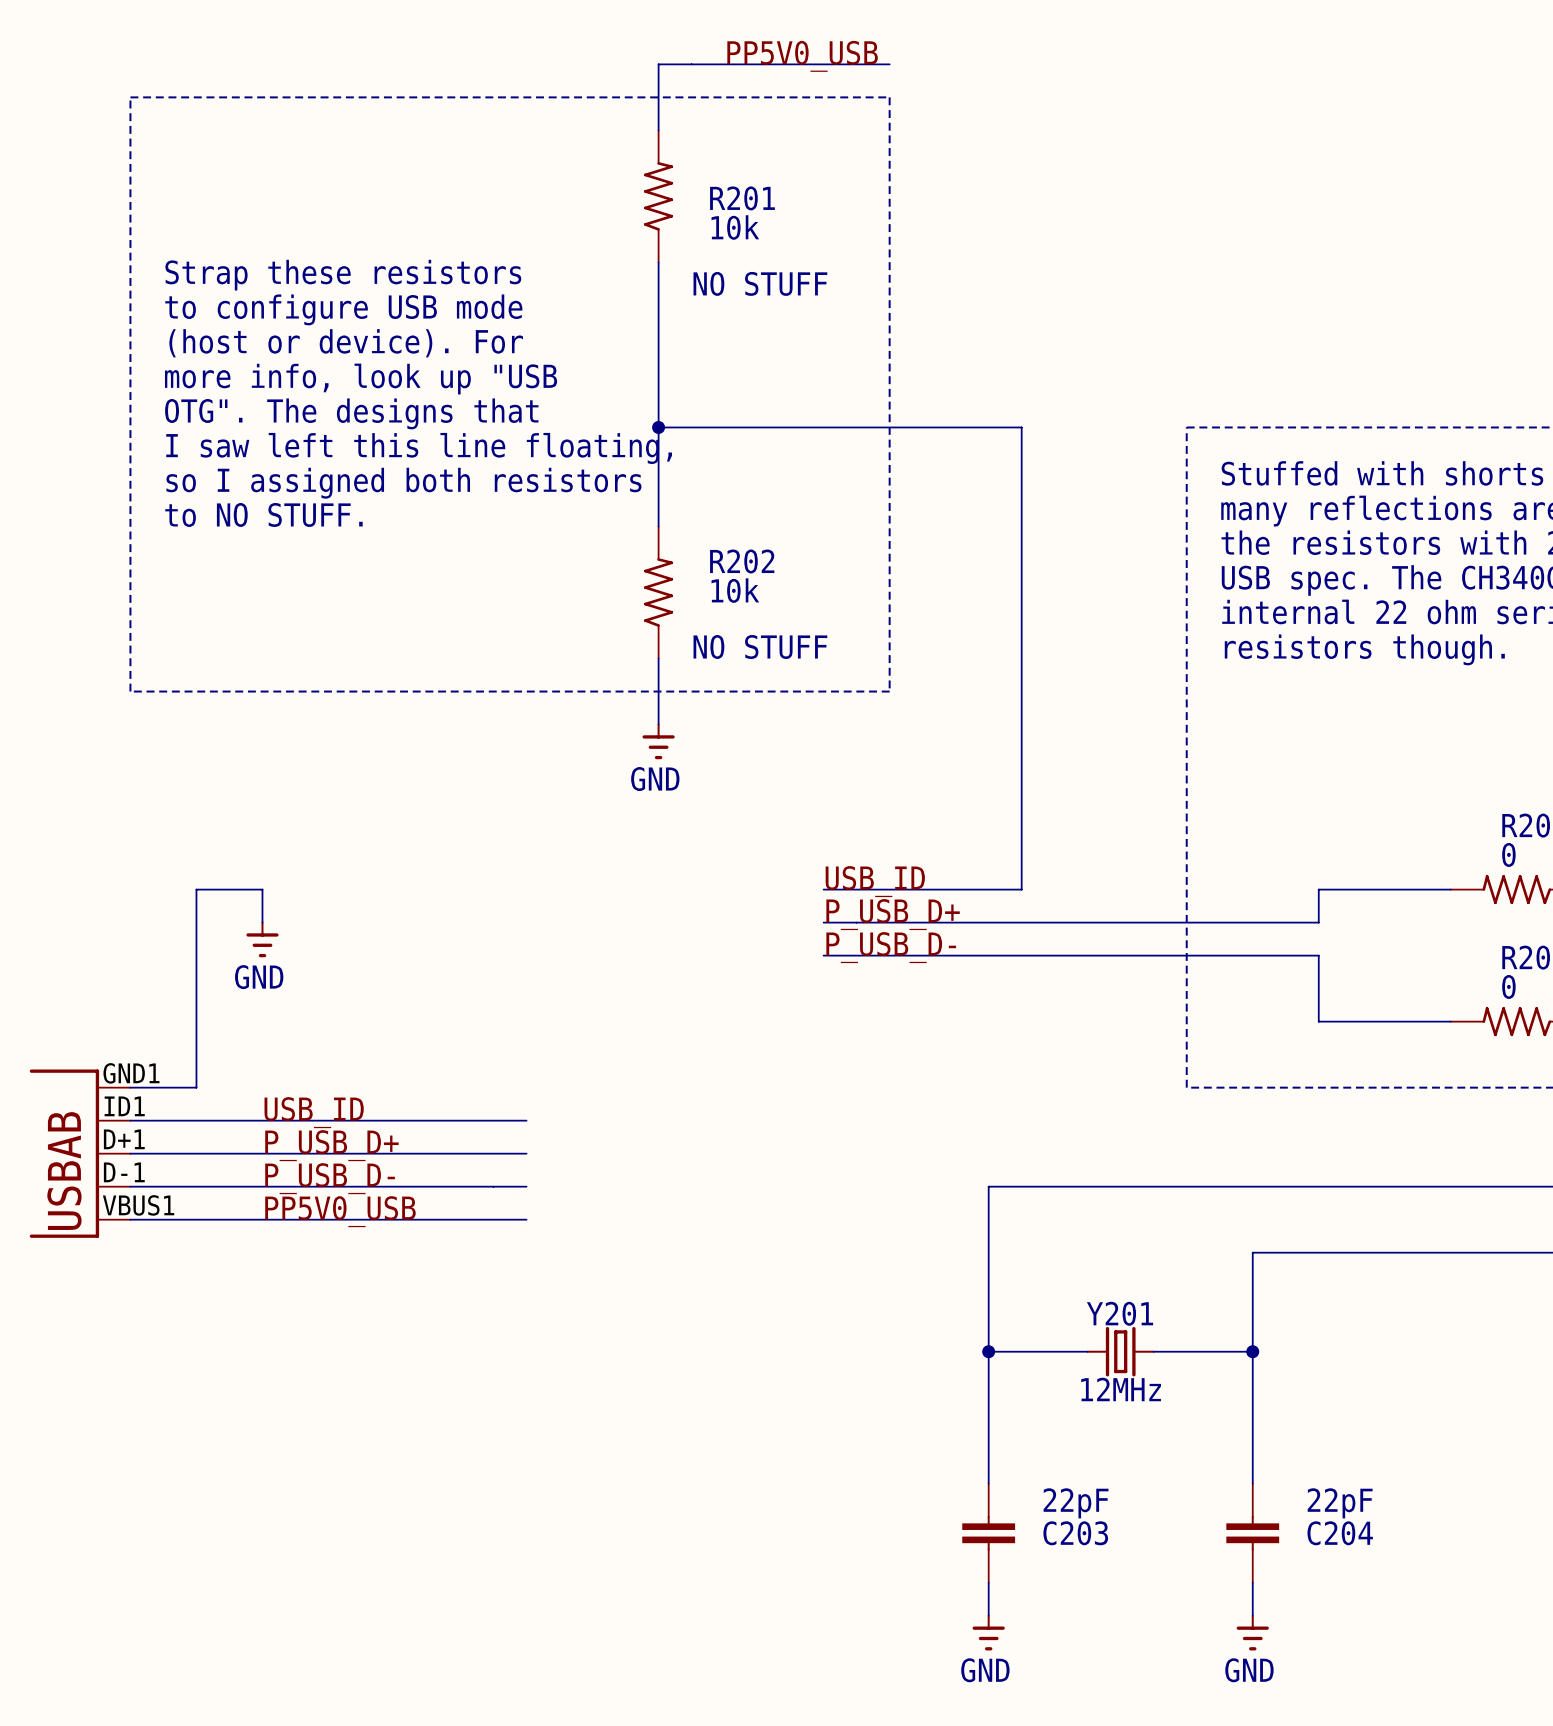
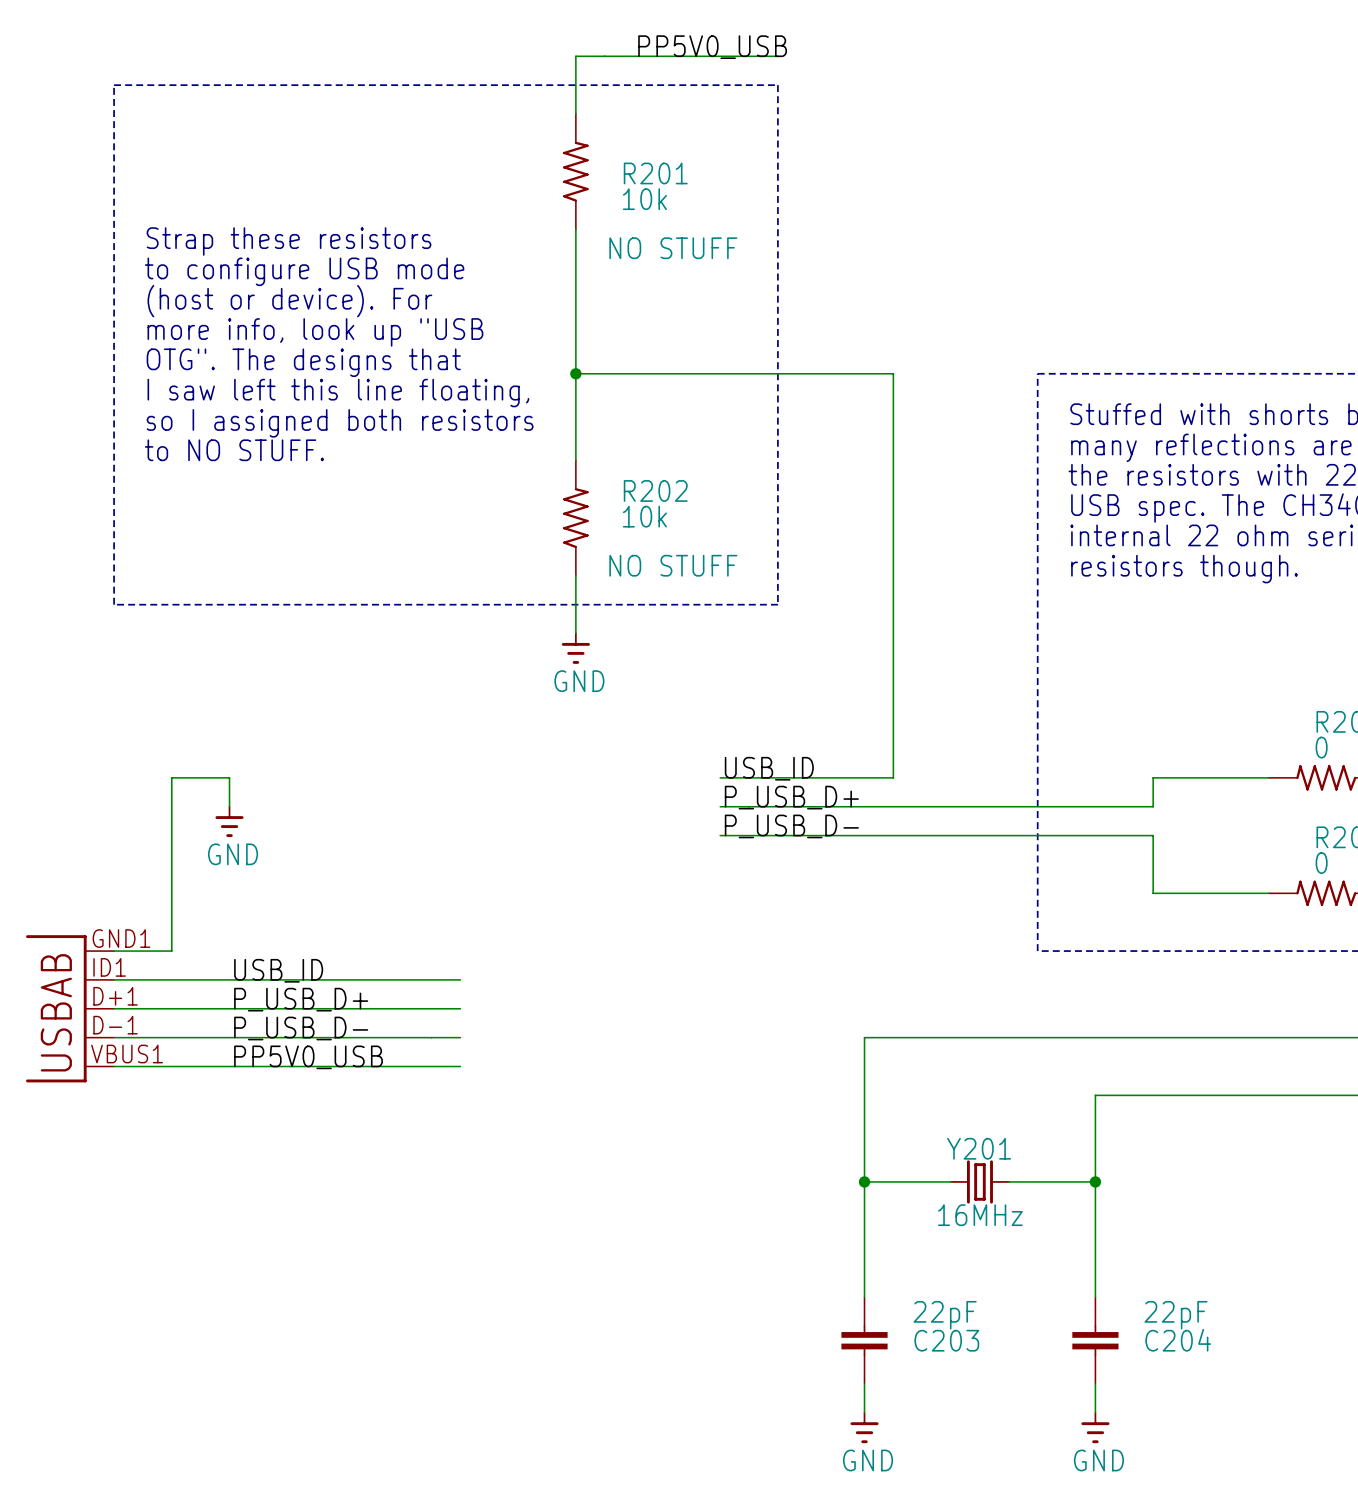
Y201 value: 12MHz (1121, 1389) -> 16MHz (980, 1215)

